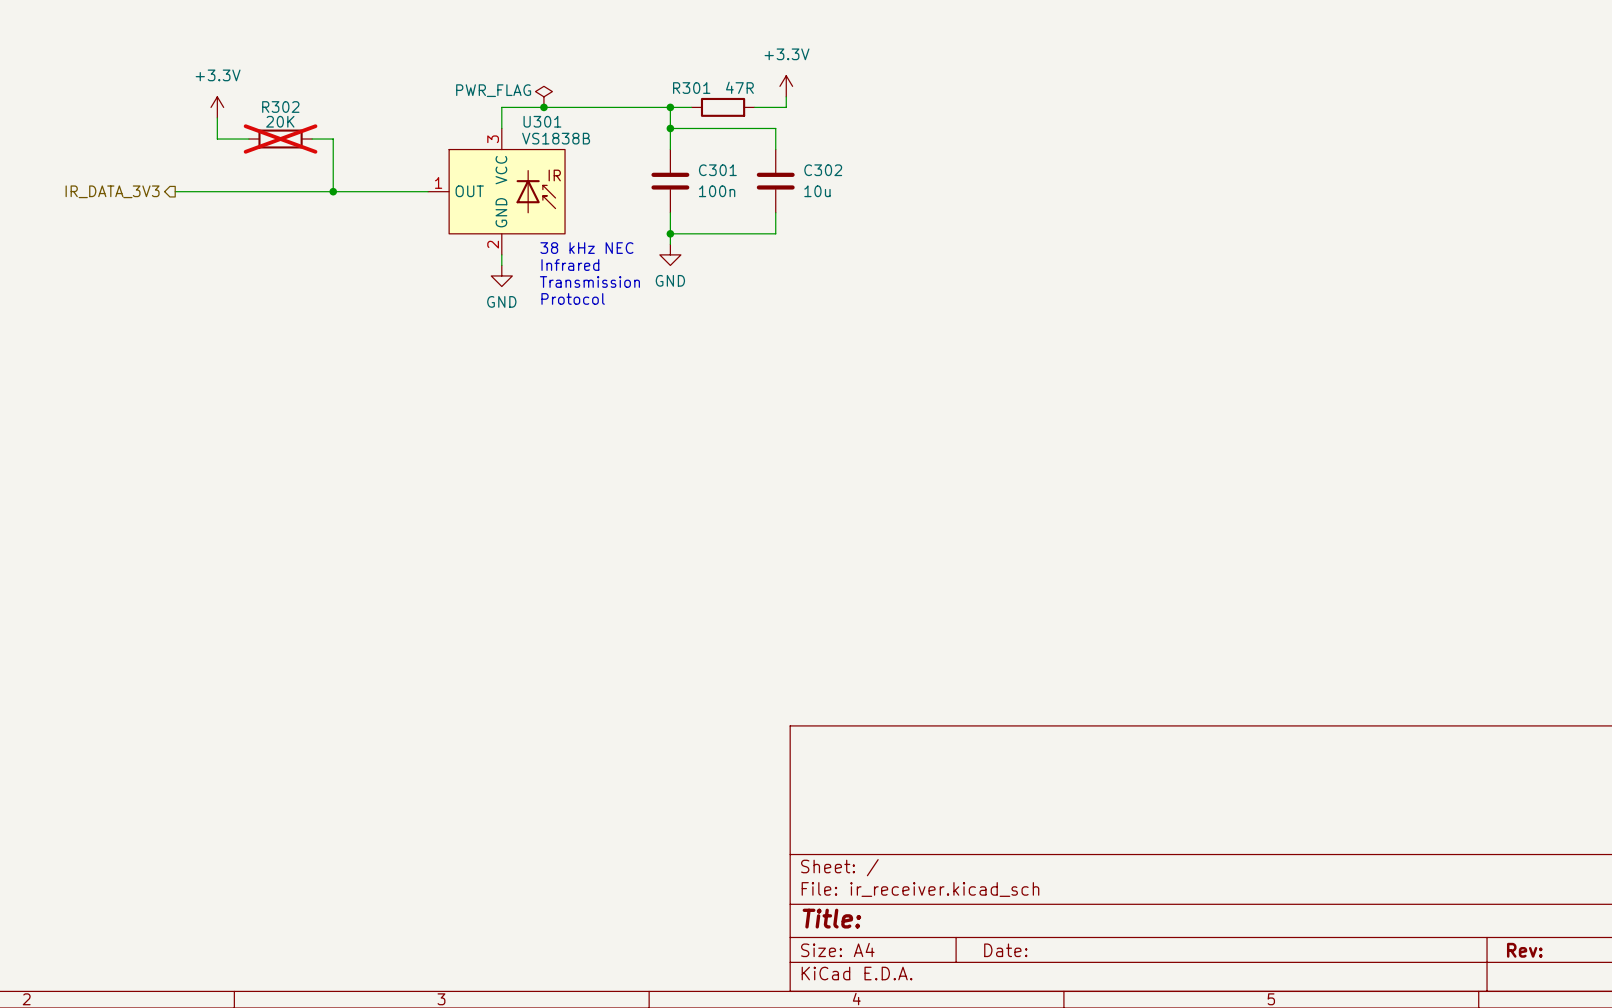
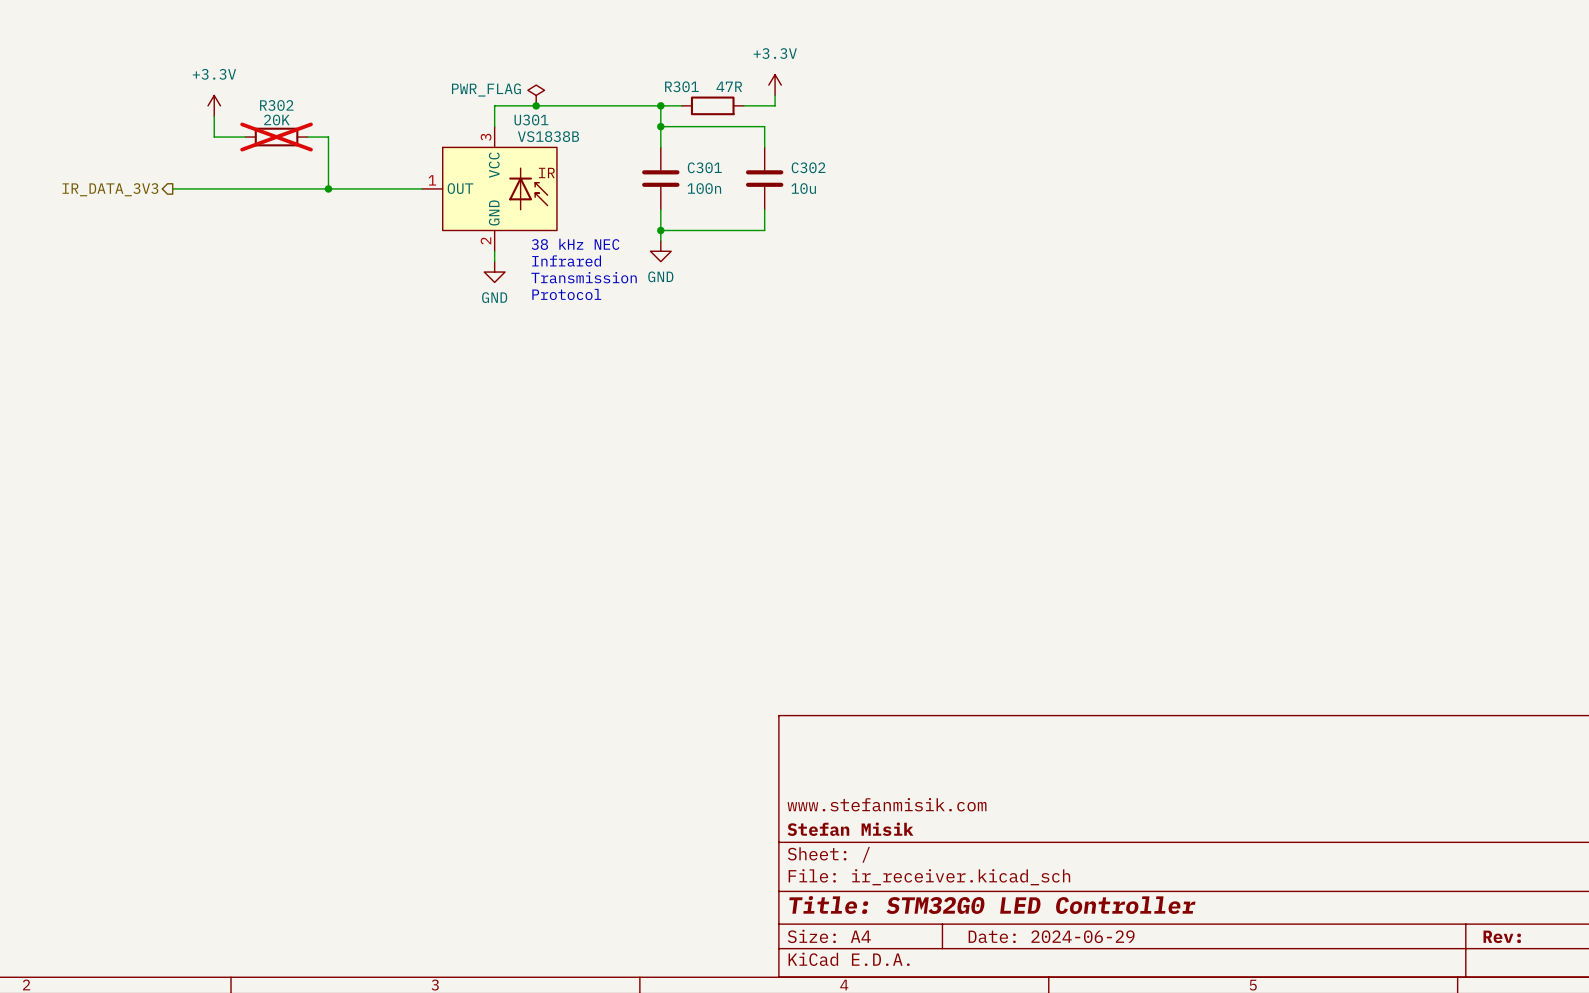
title block: none -> www.stefanmisik.com (887, 804)
title block: none -> Stefan Misik (850, 829)
title block: Title: (831, 918) -> Title: STM32G0 LED Controller (992, 905)
title block: Date: (1005, 950) -> Date: 2024-06-29 (1051, 936)

